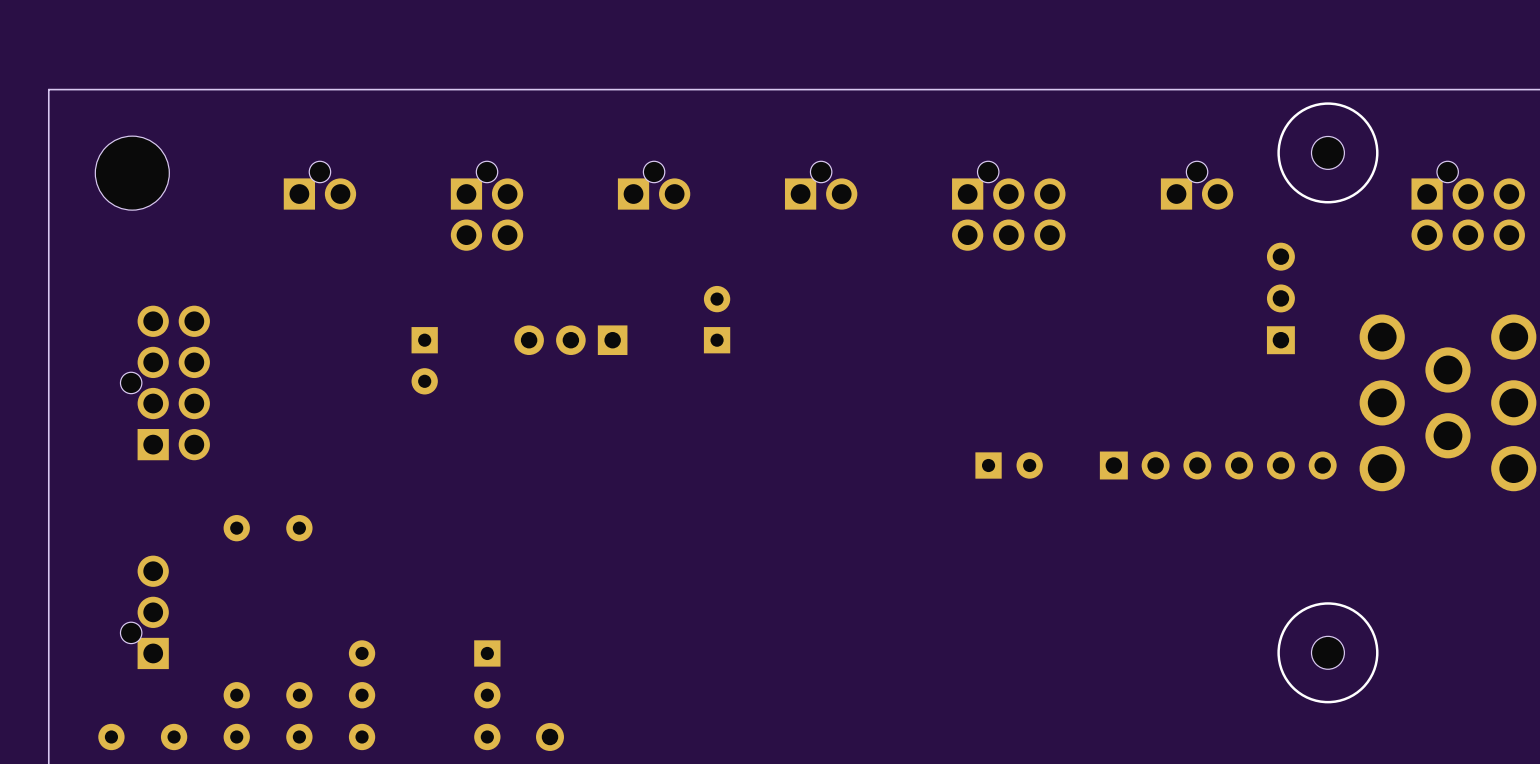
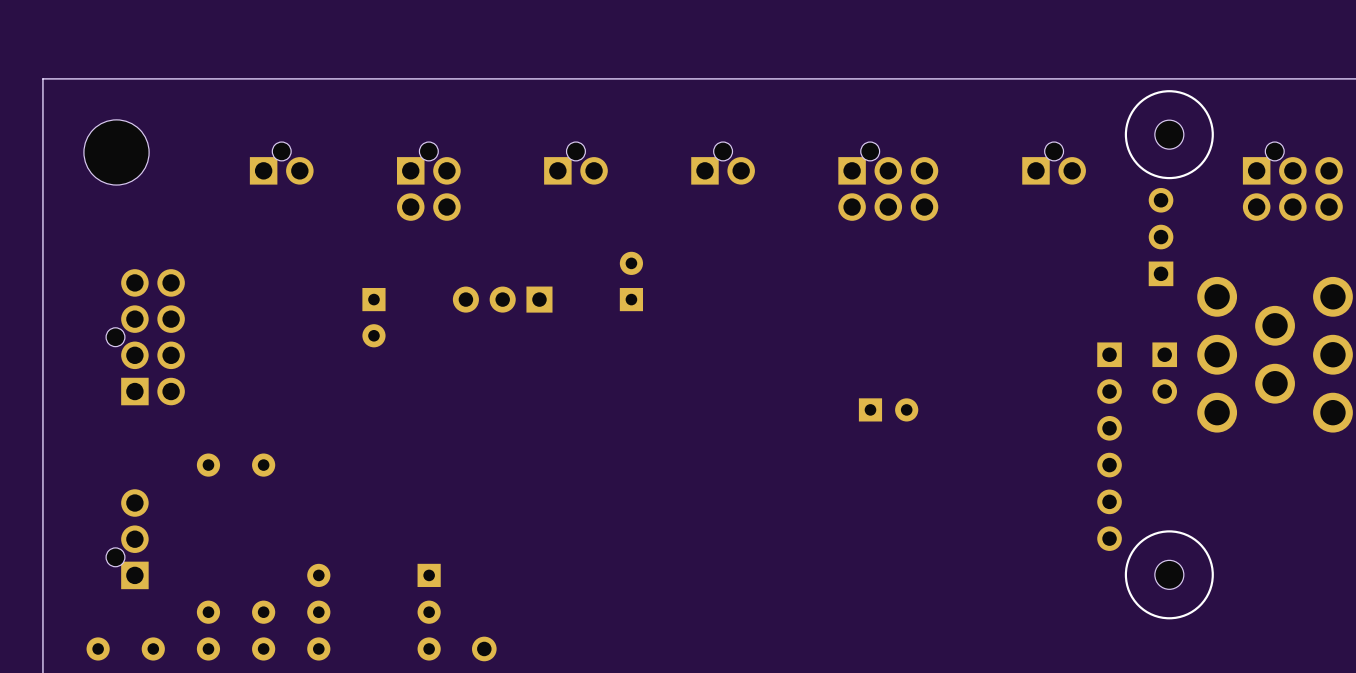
part position: (1280, 298) -> (1161, 237)
part: none -> (1164, 373)
part rotation: 0° (1218, 465) -> 90° clockwise (1109, 446)

